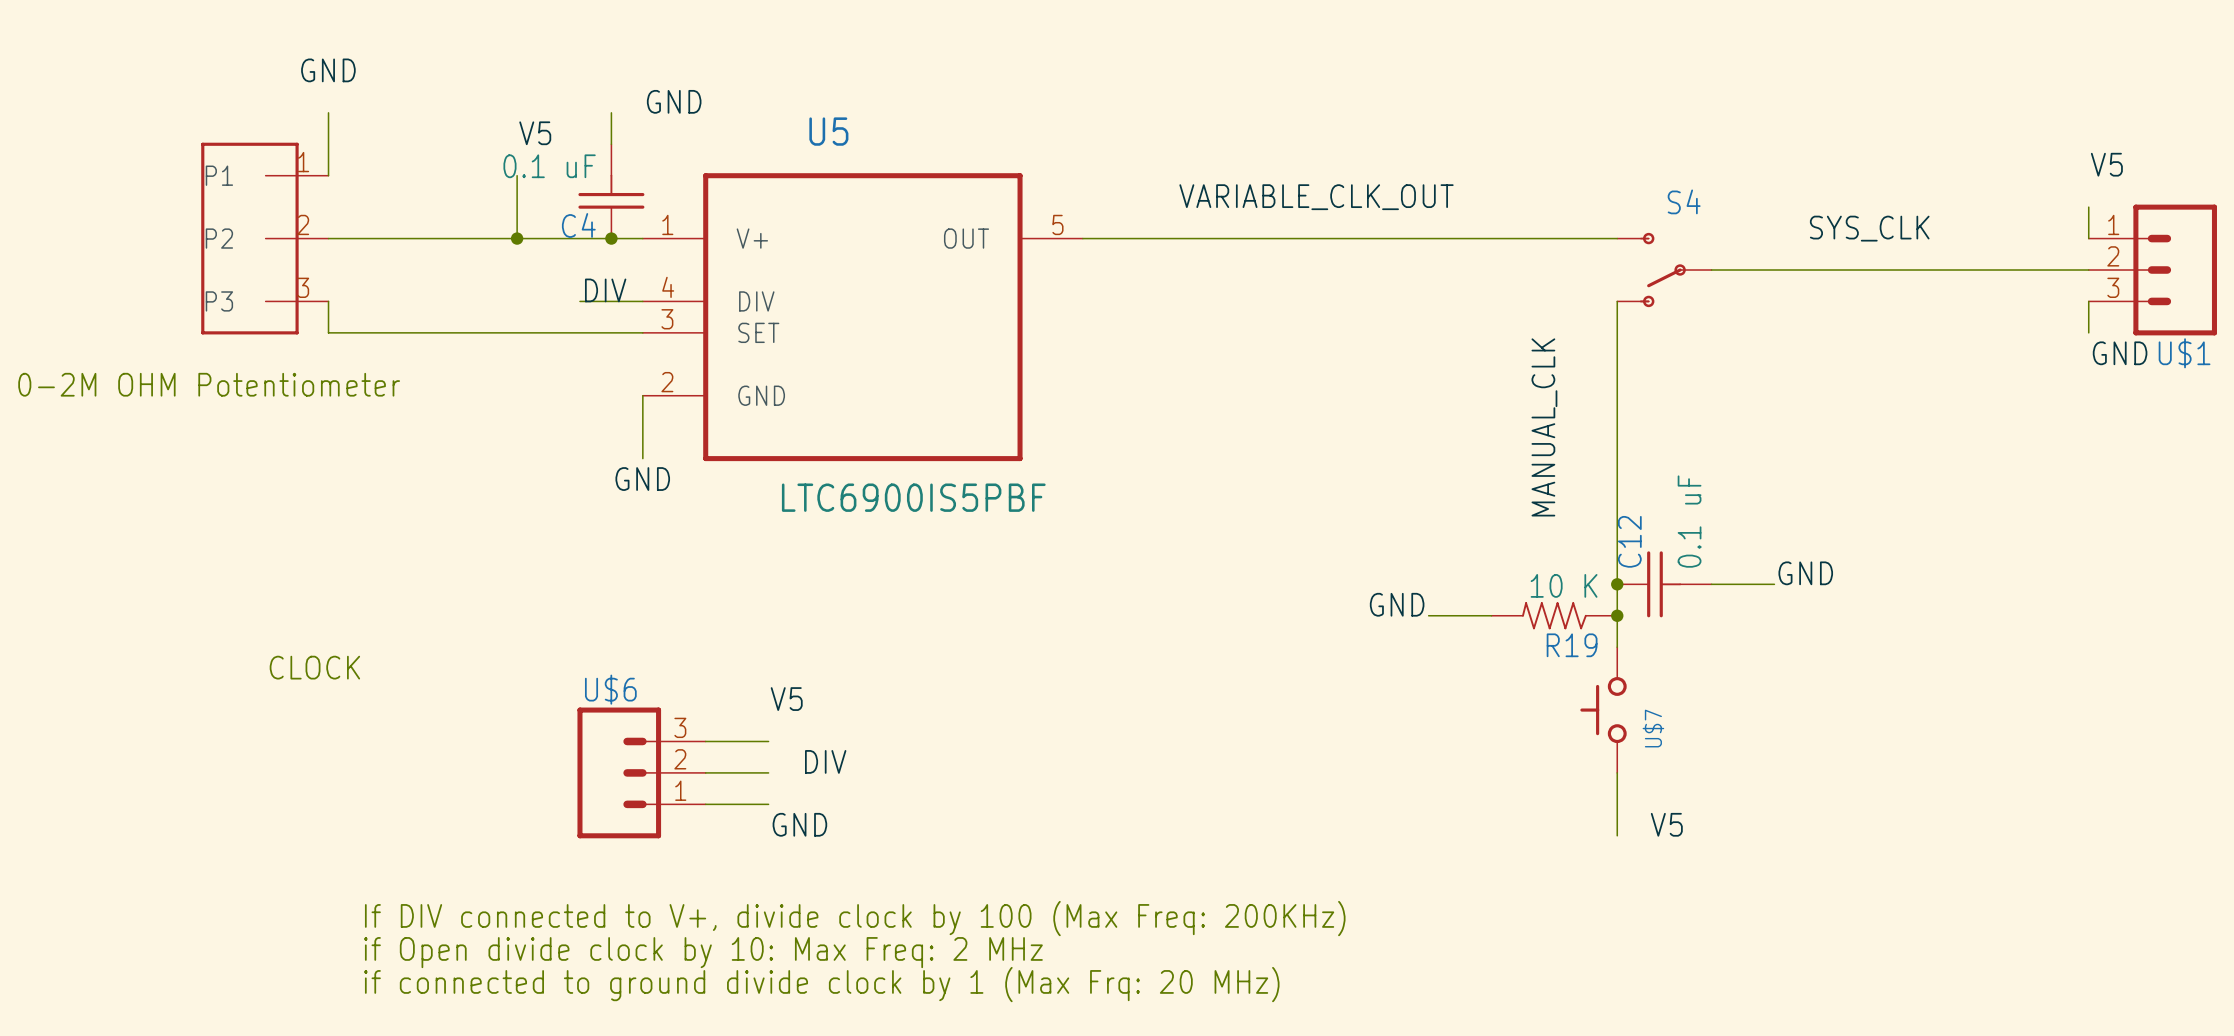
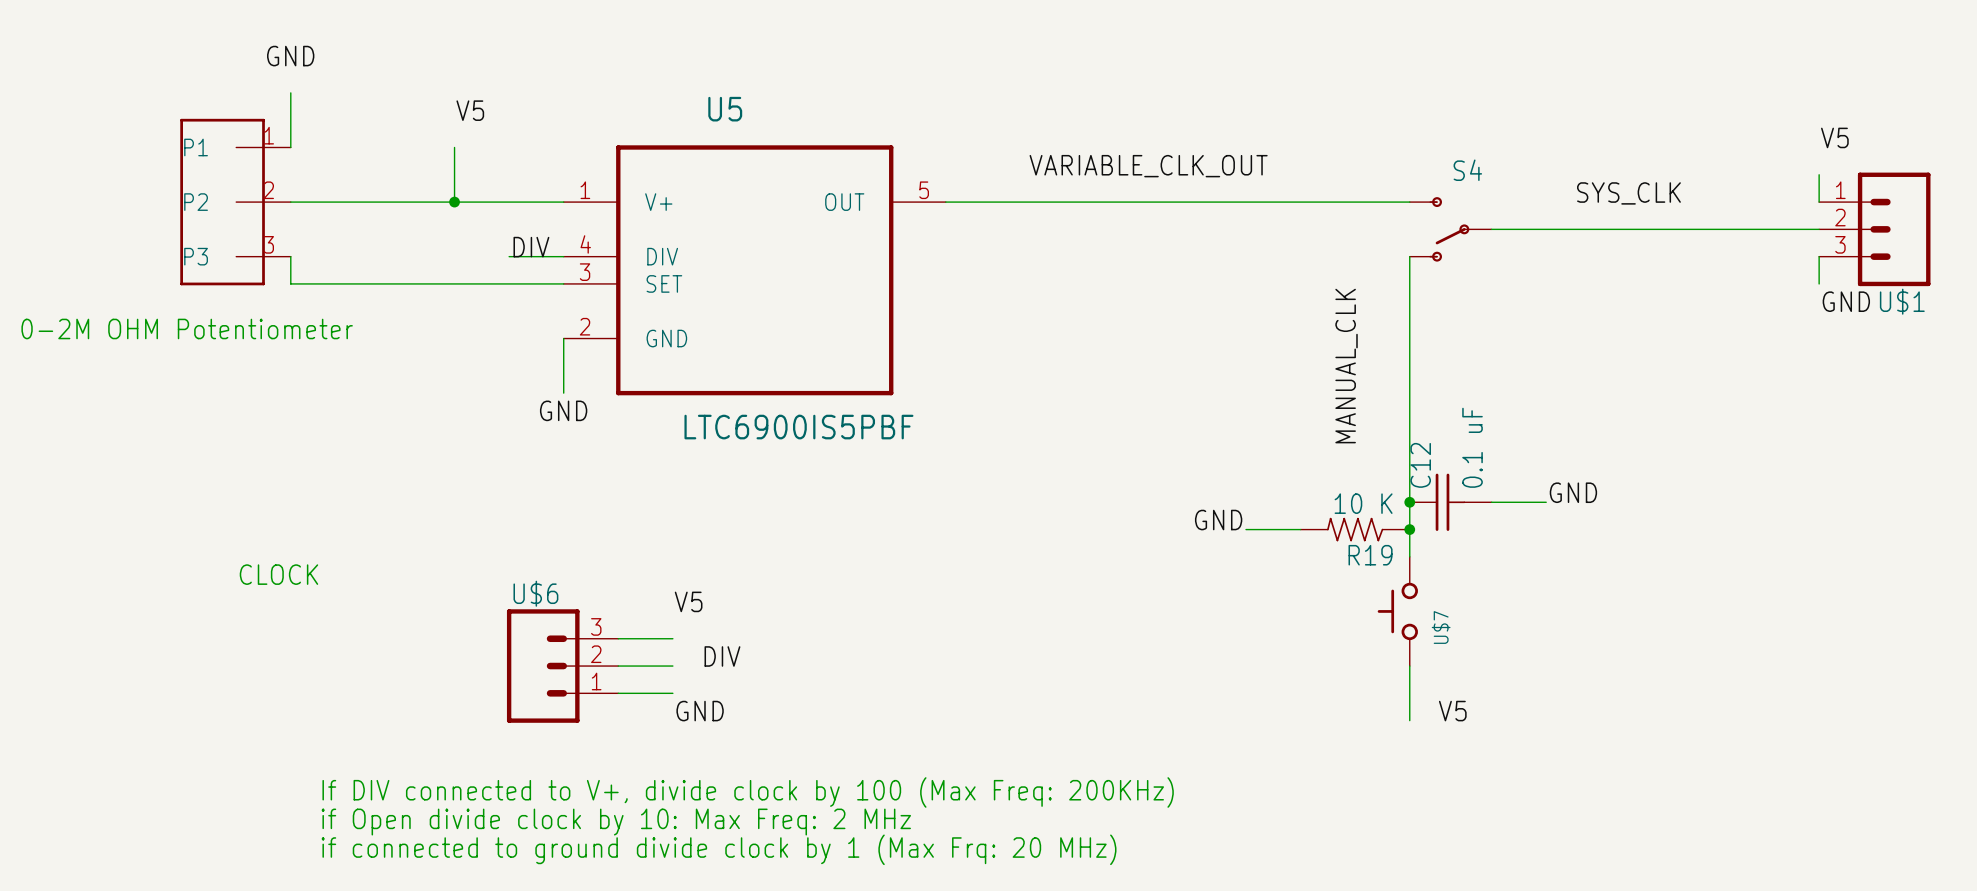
label: GND (674, 101) -> none
wire: (611, 112) (611, 144) -> none
C4: 0.1 uF (611, 191) -> none
junction: (611, 238) -> none

